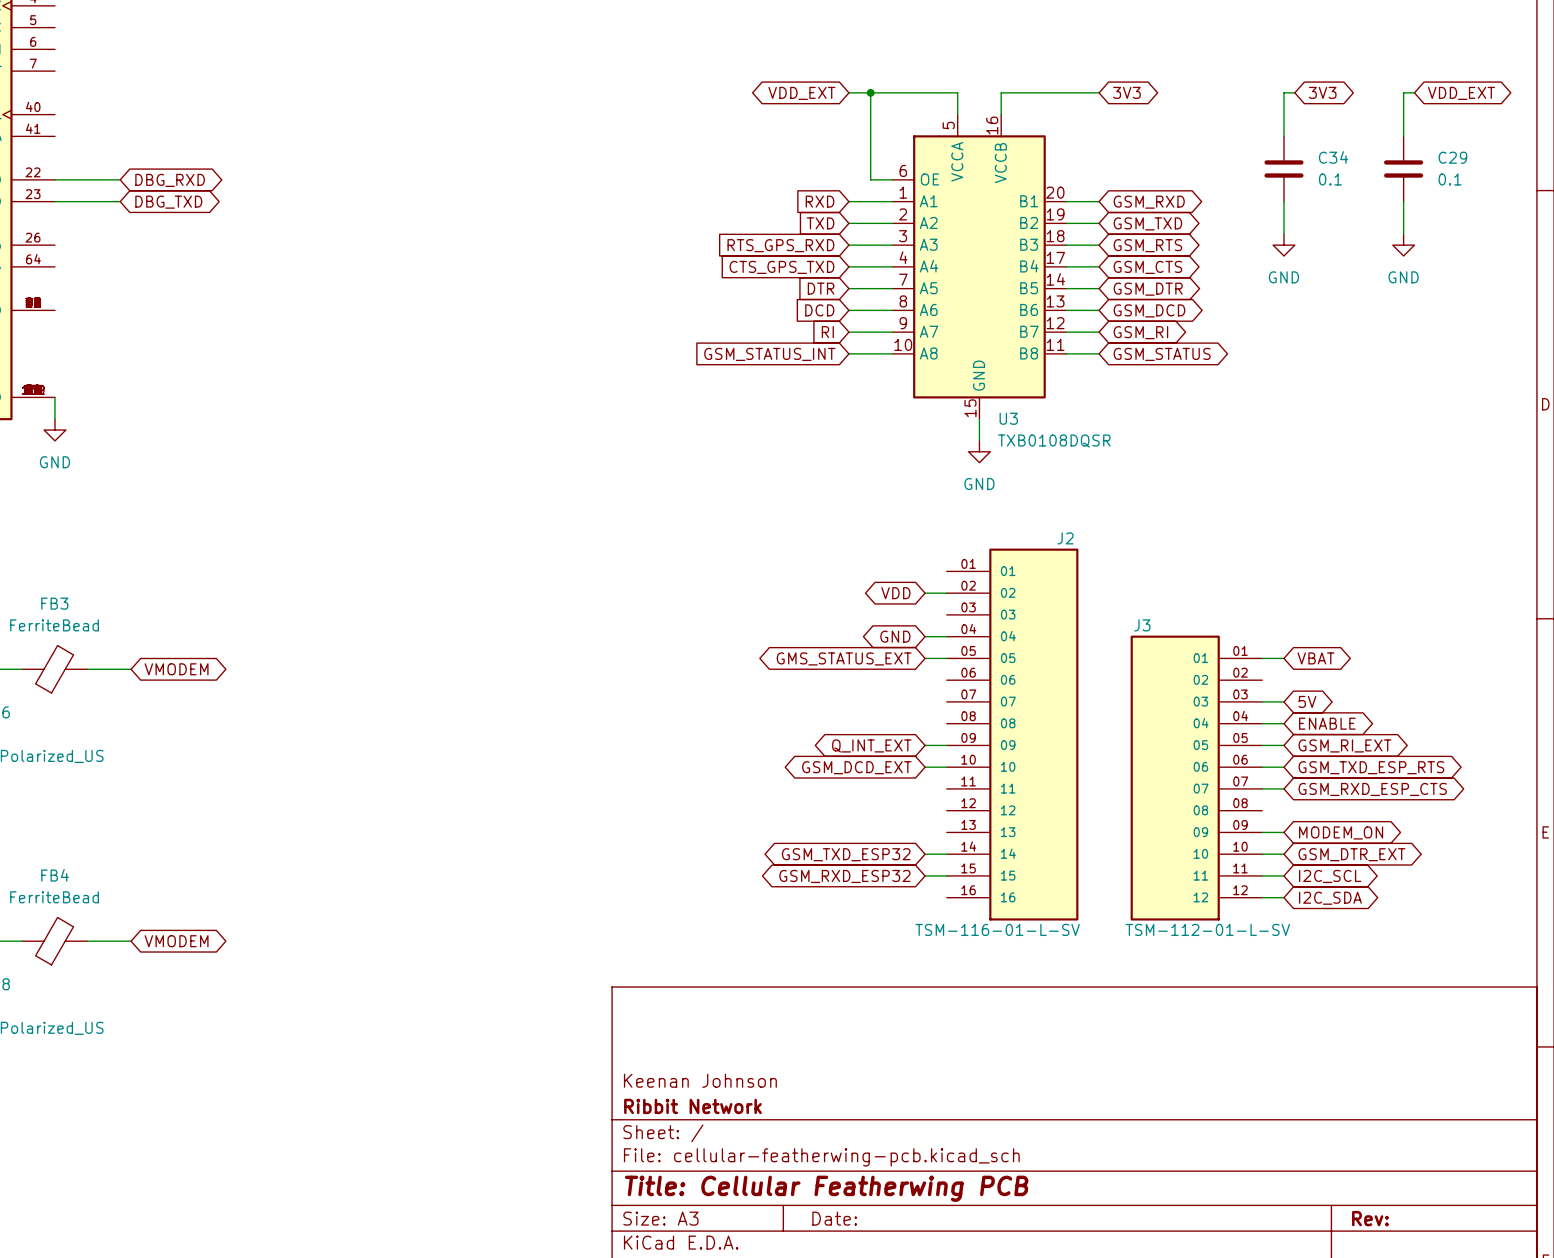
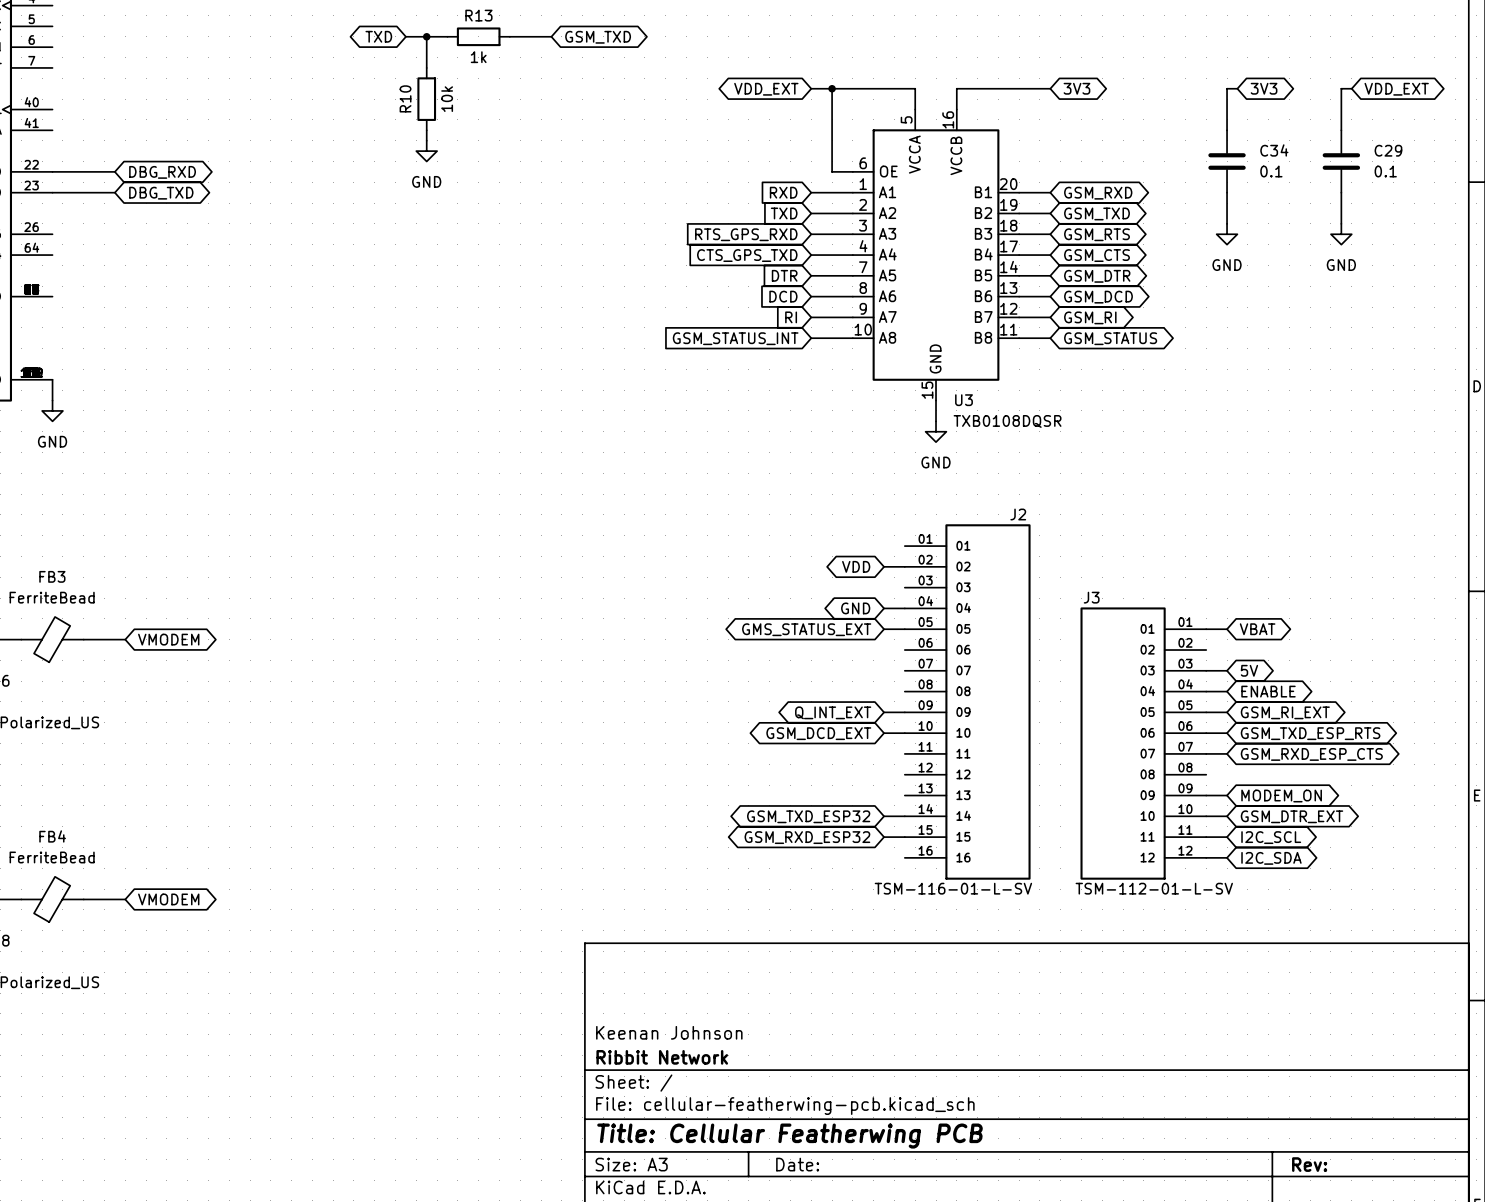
global label: none -> TXD (378, 36)
wire: none -> (405, 36) (447, 36)
wire: none -> (426, 36) (426, 67)
junction: none -> (426, 36)
R13: none -> 1k (478, 36)
wire: none -> (509, 36) (551, 36)
global label: none -> GSM_TXD (598, 37)
R10: none -> 10k (426, 99)
wire: none -> (426, 130) (426, 140)
power symbol: none -> GND (426, 151)

